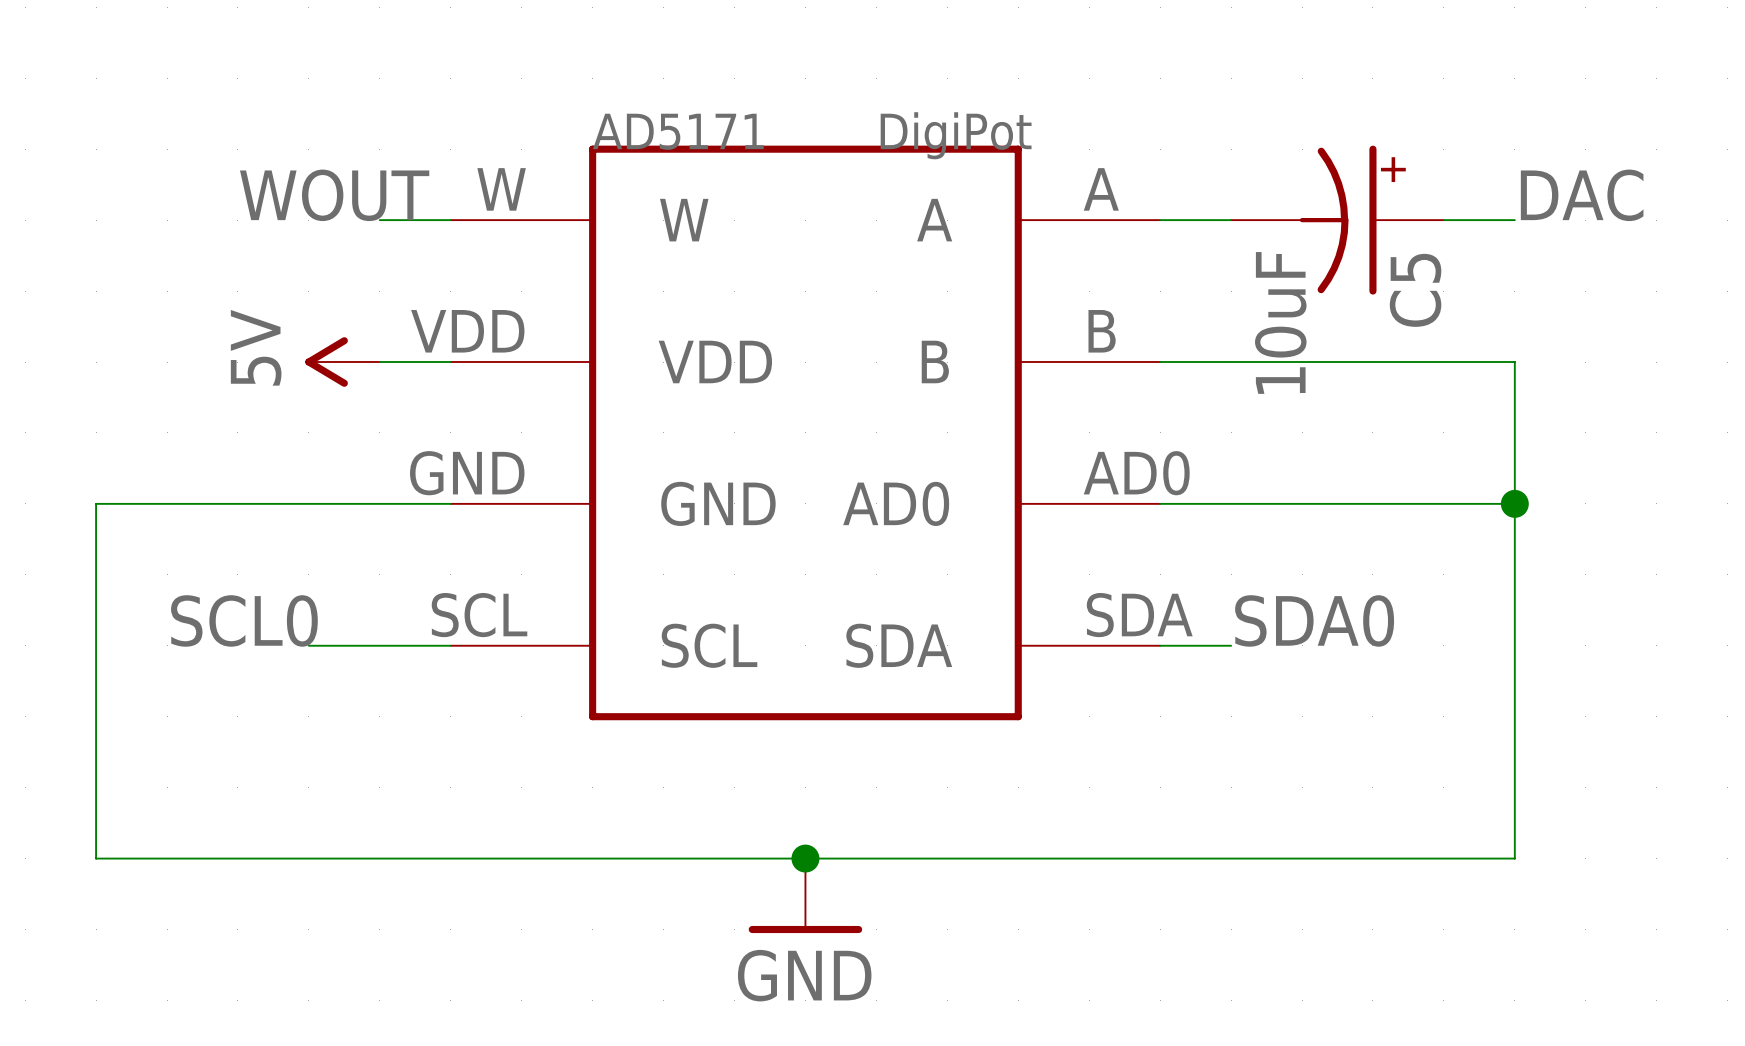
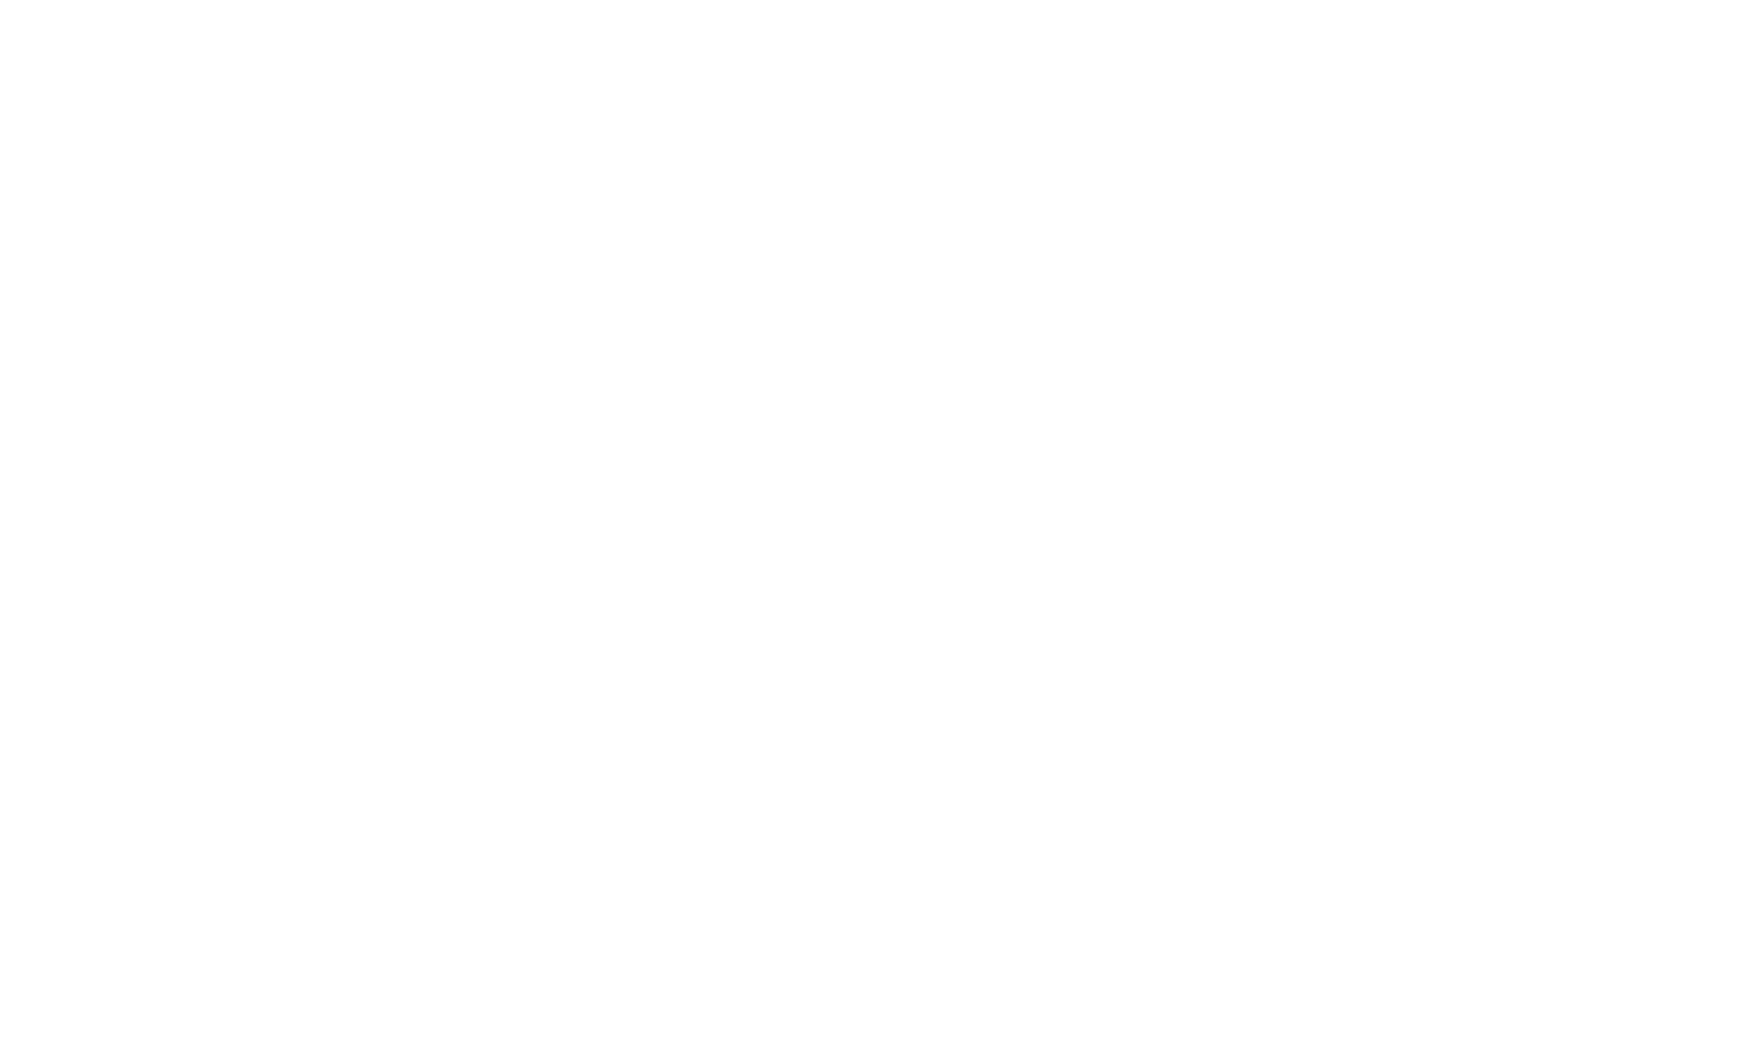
label: WOUT (334, 195) -> none
label: DAC (1582, 195) -> none
wire: (379, 220) (450, 220) -> none
wire: (1160, 220) (1231, 220) -> none
C5: 10uF (1337, 220) -> none
wire: (1443, 220) (1514, 220) -> none
power symbol: 5V (342, 362) -> none
wire: (379, 362) (450, 362) -> none
wire: (1160, 362) (1514, 362) (1514, 858) (96, 858) (96, 503) (450, 503) -> none
part: (805, 432) -> none
wire: (1160, 503) (1514, 503) -> none
junction: (1514, 503) -> none
label: SCL0 (244, 620) -> none
label: SDA0 (1314, 620) -> none
wire: (308, 645) (450, 645) -> none
wire: (1160, 645) (1231, 645) -> none
junction: (805, 858) -> none
power symbol: GND (805, 895) -> none

